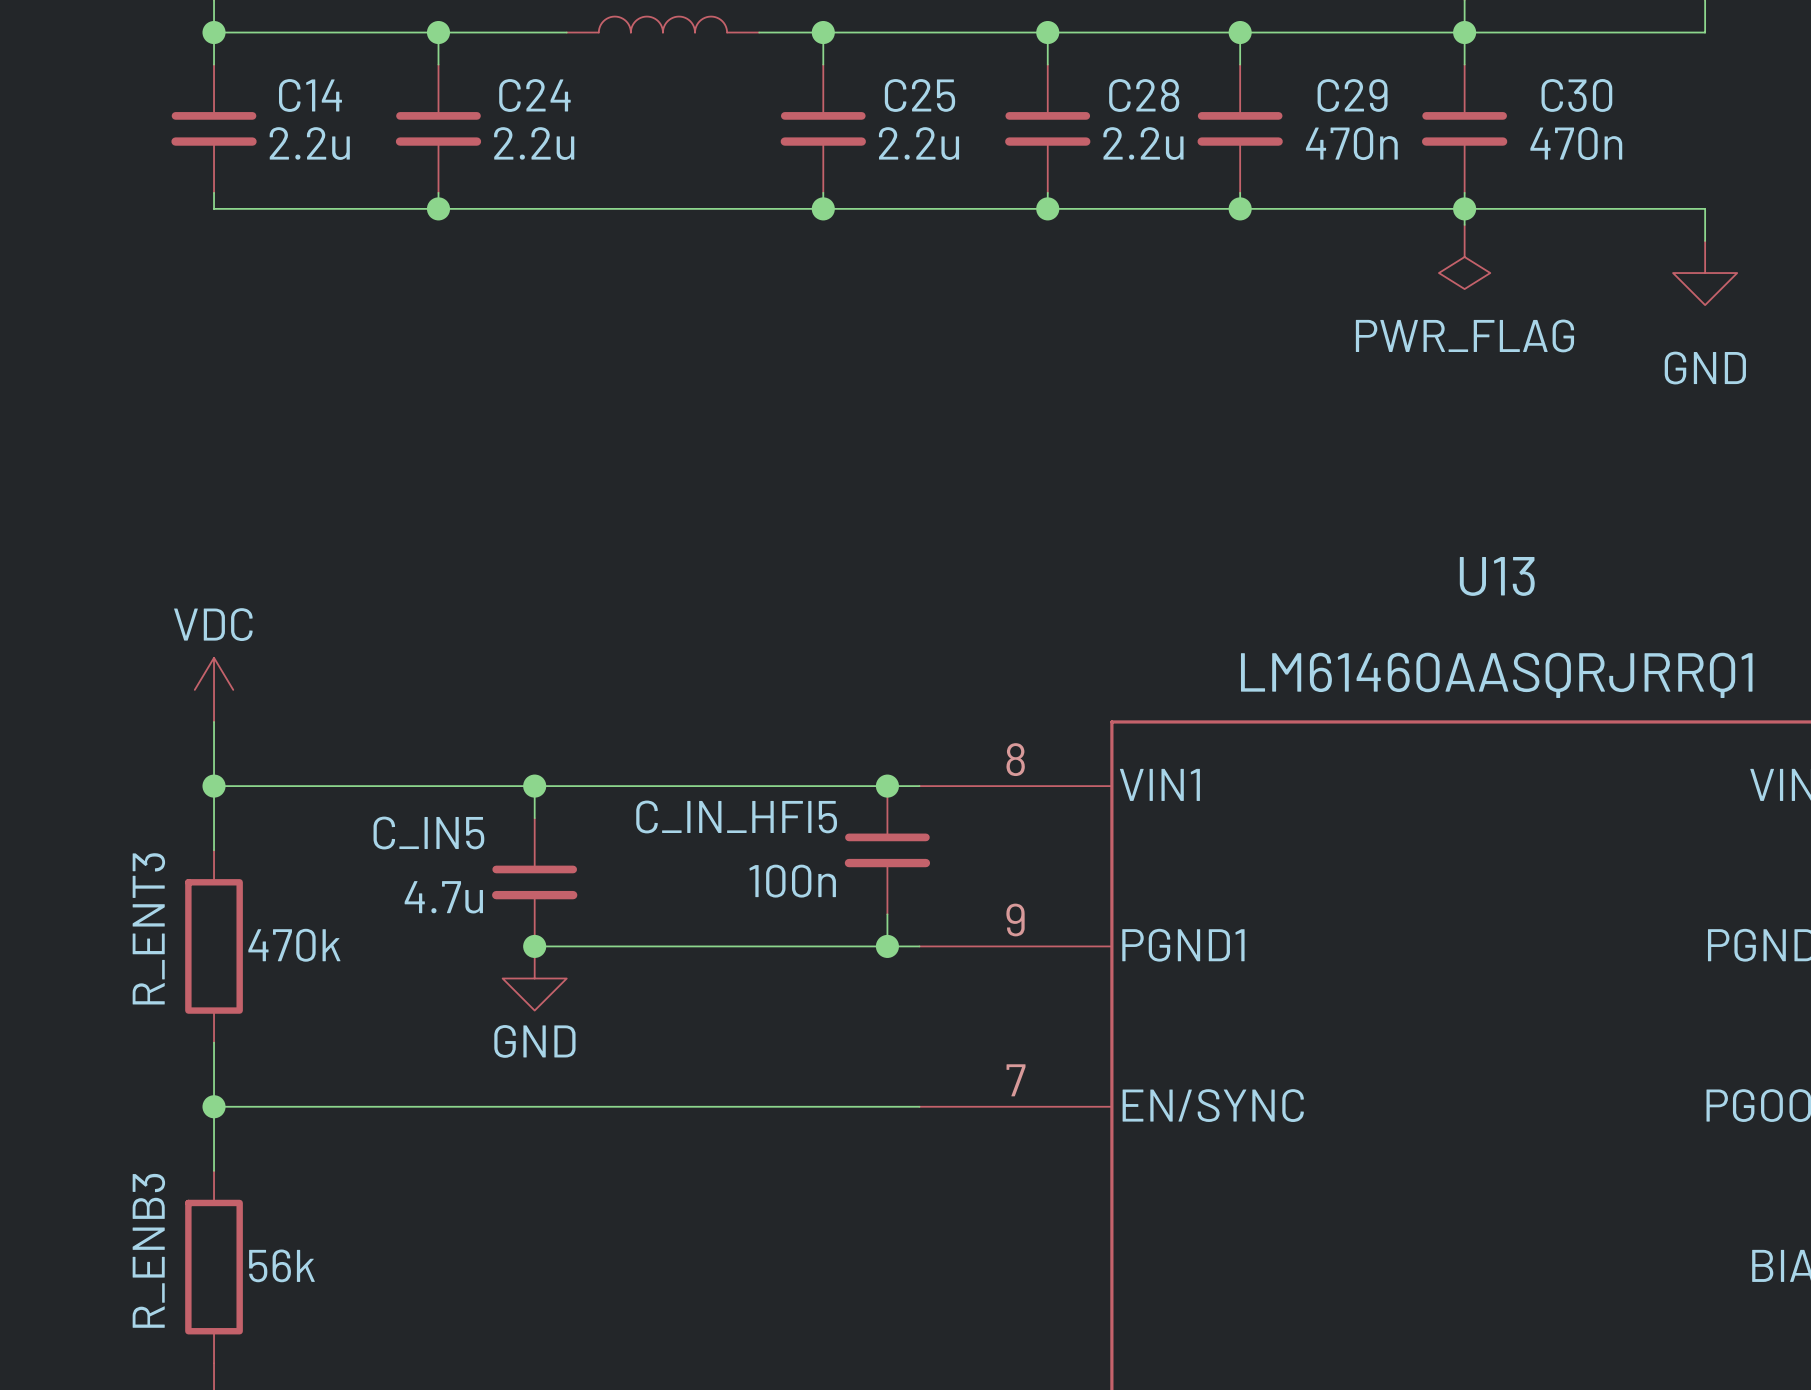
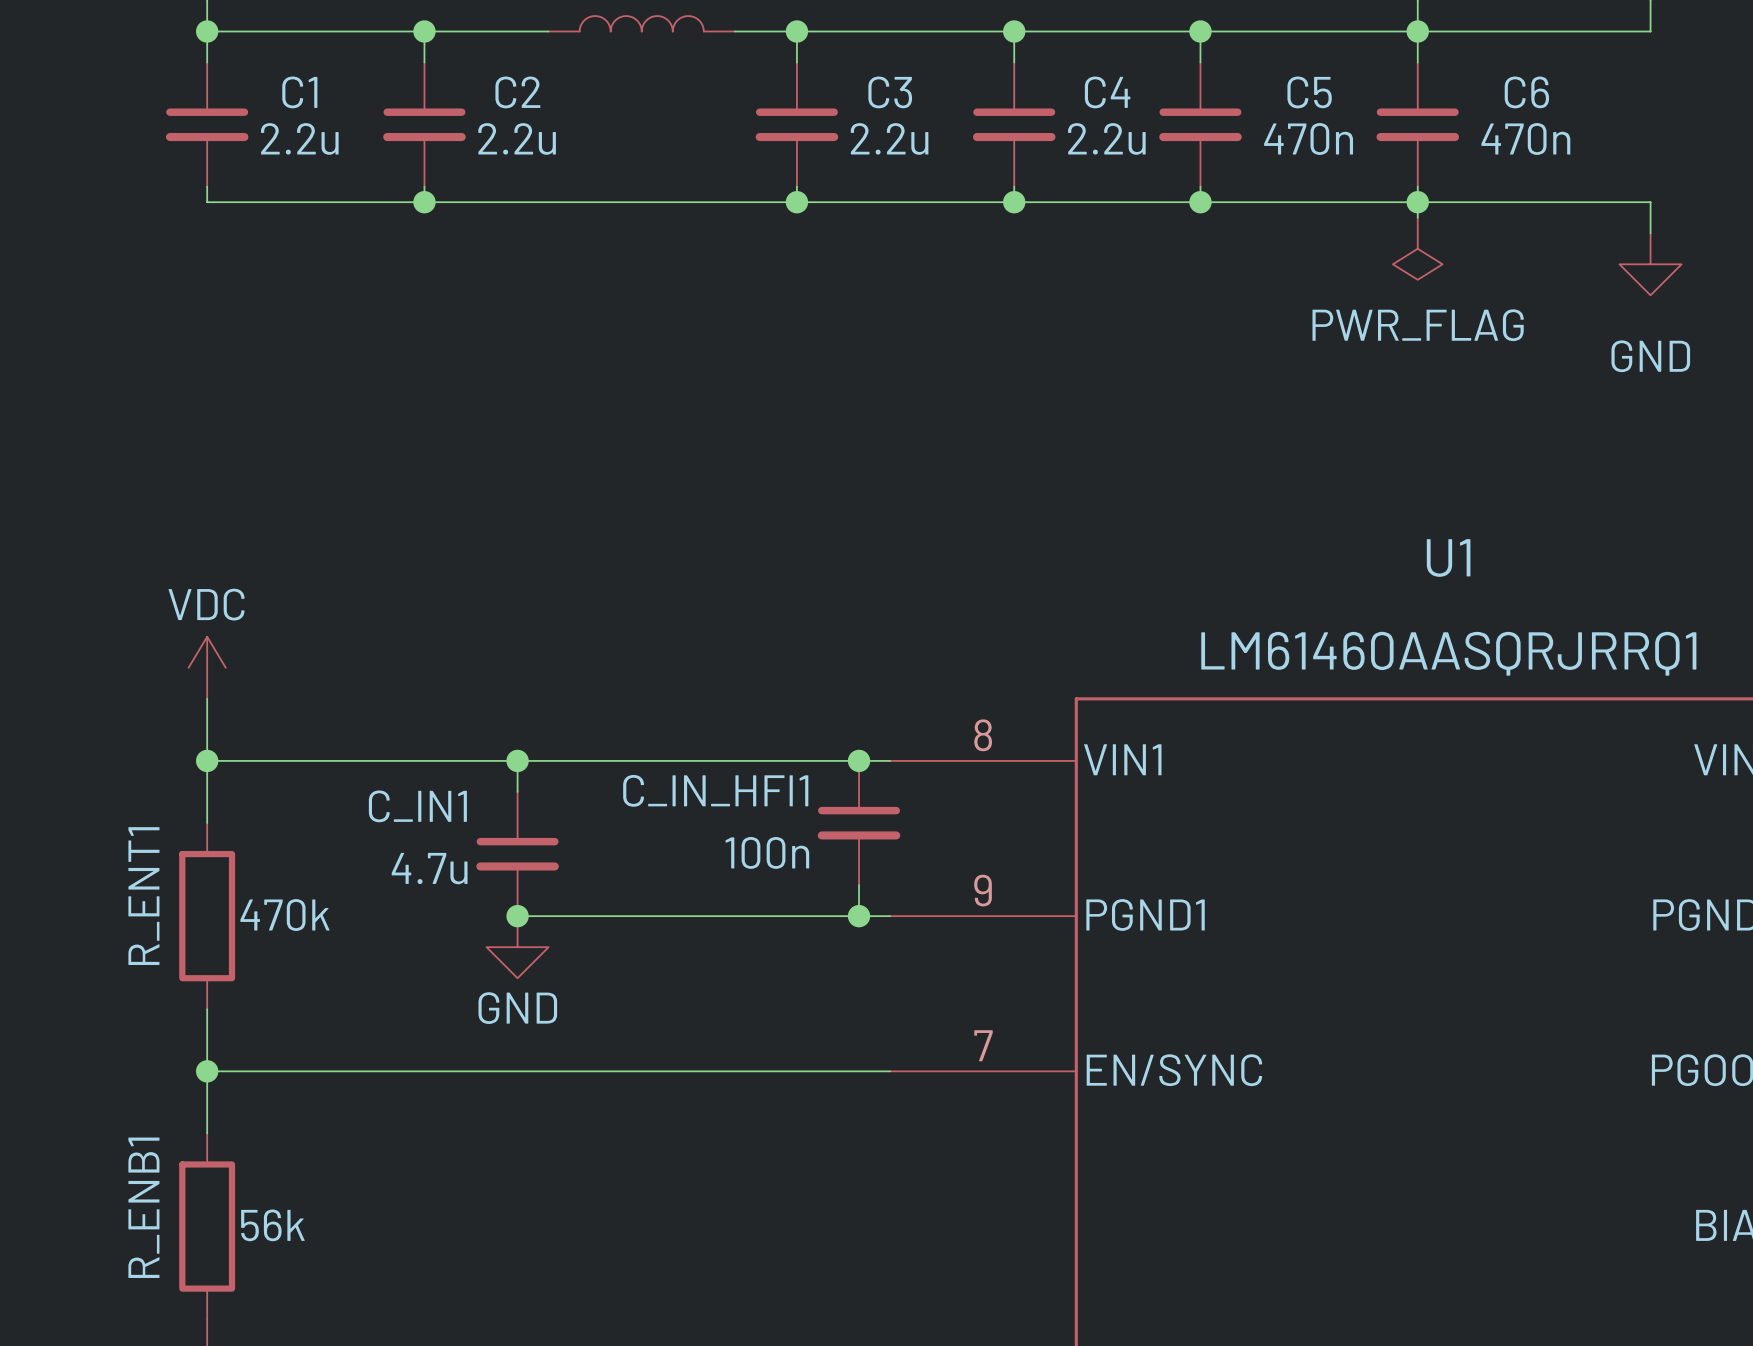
C14 name: C14 (310, 95) -> C1 (299, 92)
C24 name: C24 (534, 95) -> C2 (517, 92)
C25 name: C25 (920, 95) -> C3 (890, 92)
C28 name: C28 (1144, 95) -> C4 (1107, 92)
C29 name: C29 (1352, 95) -> C5 (1309, 92)
C30 name: C30 (1576, 95) -> C6 (1526, 92)
U13 name: U13 (1497, 576) -> U1 (1448, 557)
C_IN_HFI5 name: C_IN_HFI5 (736, 816) -> C_IN_HFI1 (715, 790)
C_IN5 name: C_IN5 (428, 833) -> C_IN1 (417, 806)
R_ENT3 name: R_ENT3 (148, 928) -> R_ENT1 (143, 896)
R_ENB3 name: R_ENB3 (148, 1250) -> R_ENB1 (143, 1207)

